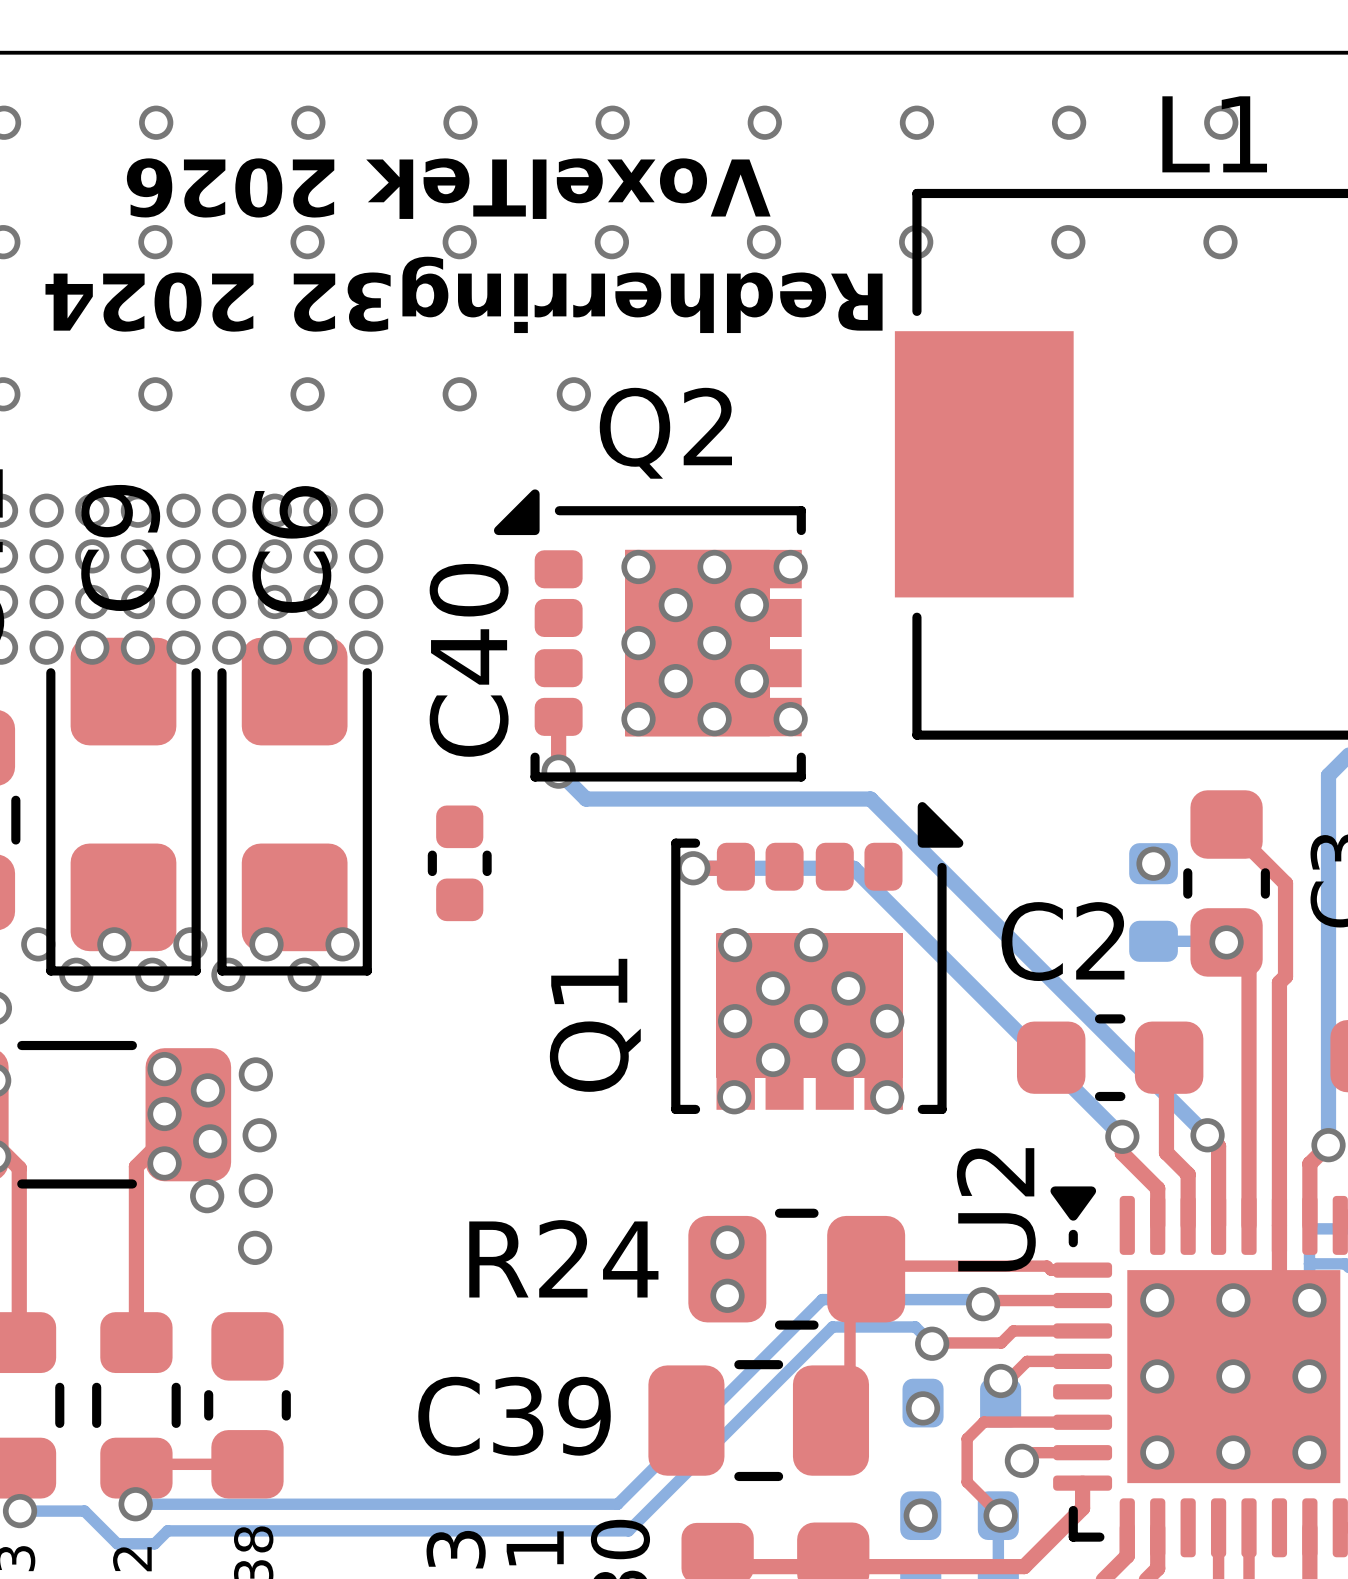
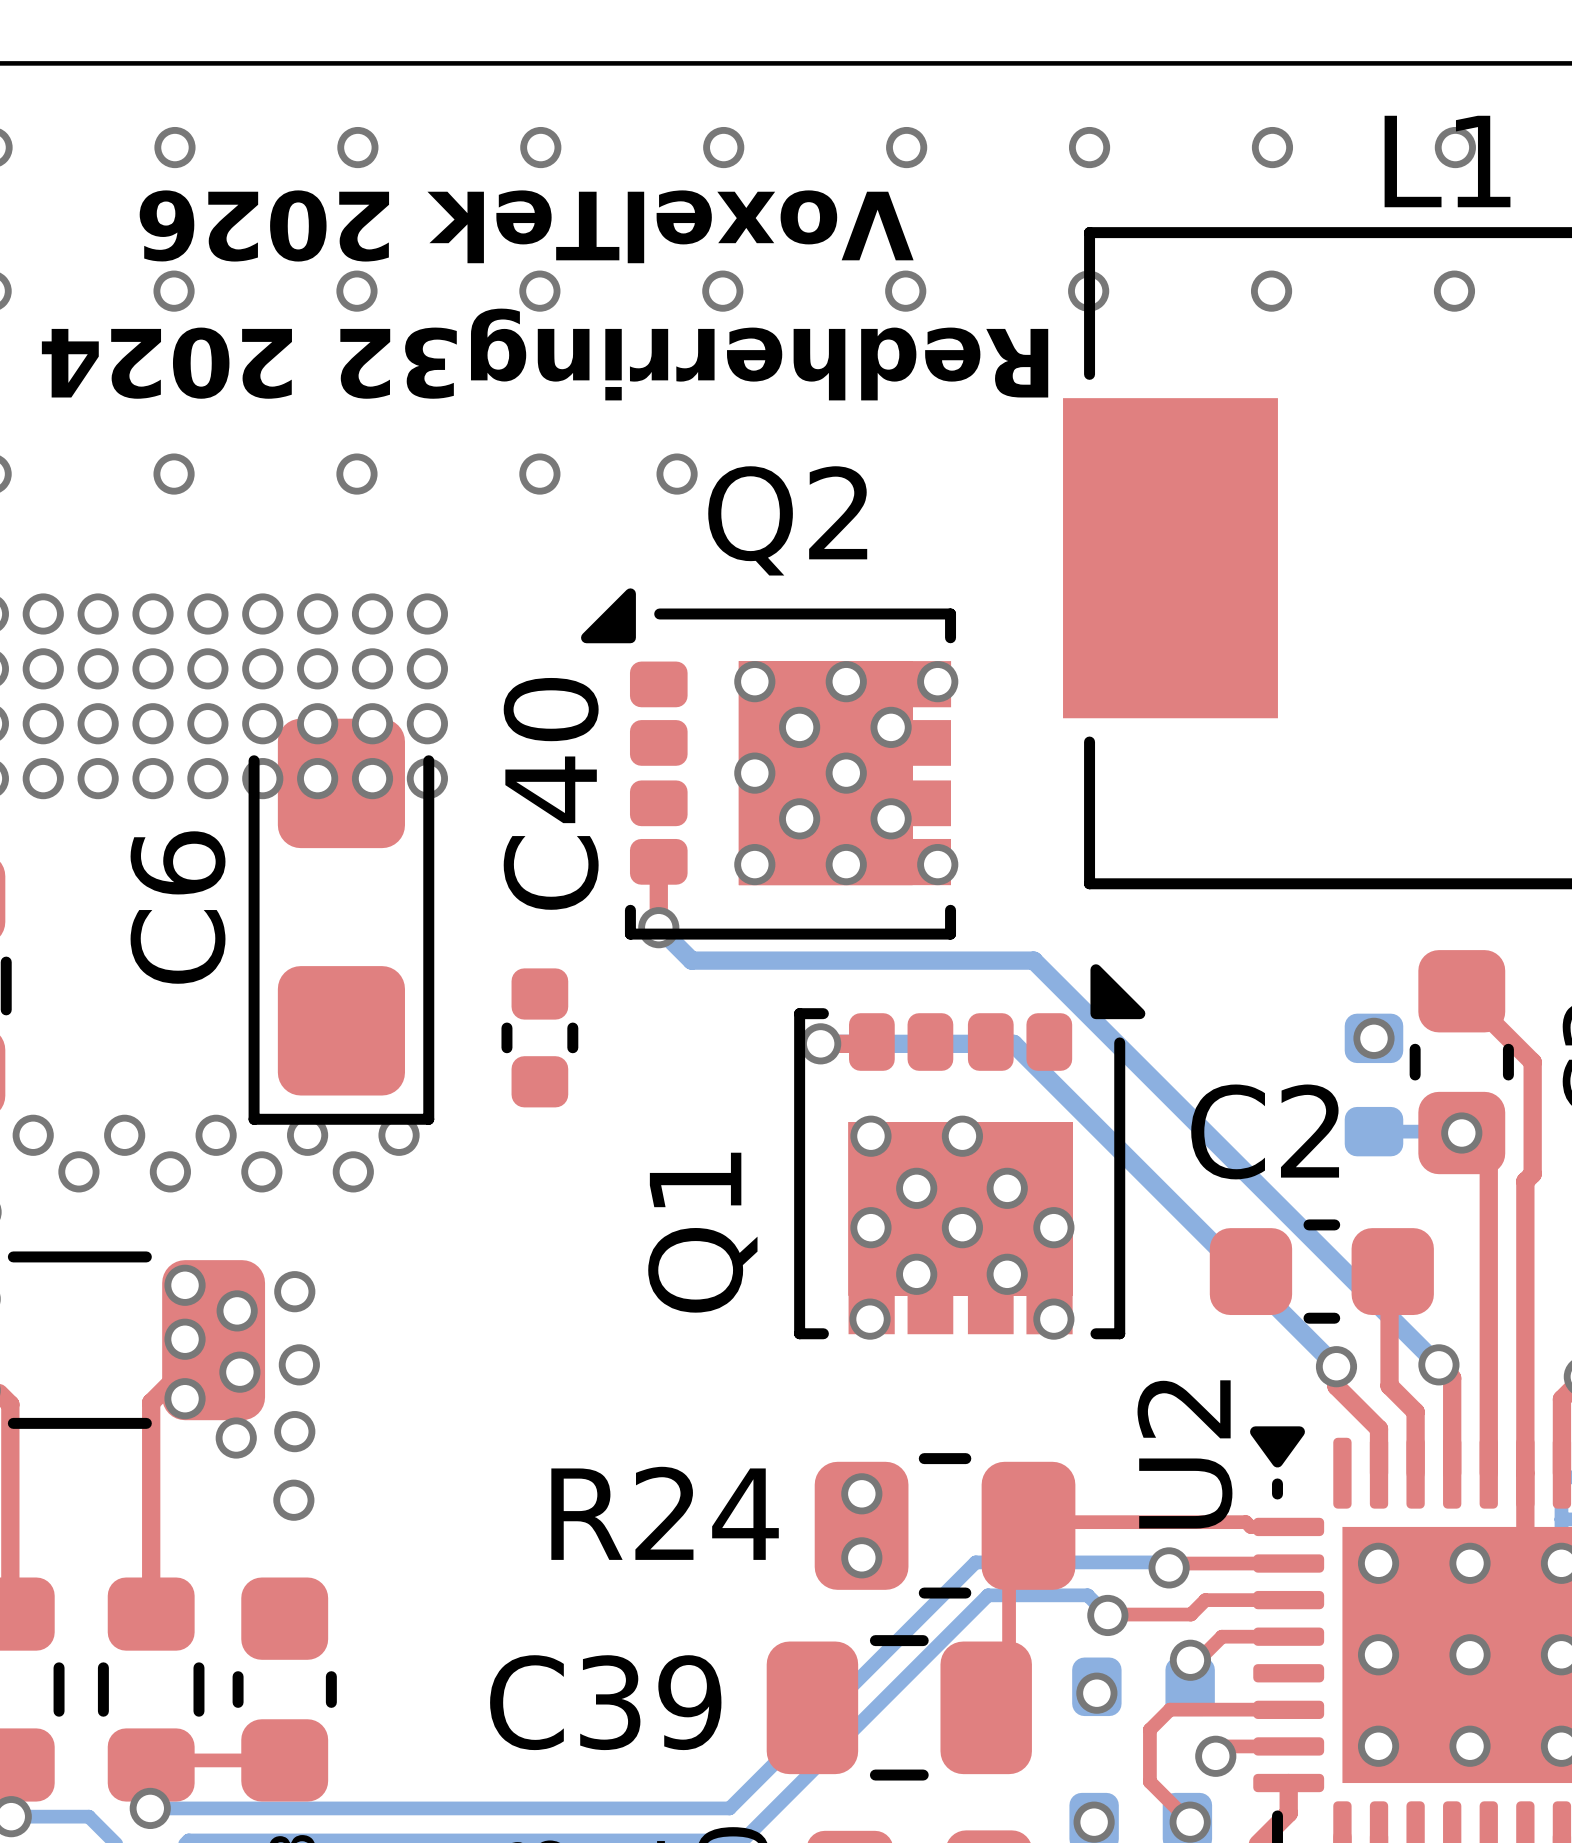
C6 name position: C6 (291, 549) -> C6 (178, 907)
C9: (123, 806) -> none
C6 position: (294, 806) -> (341, 921)

